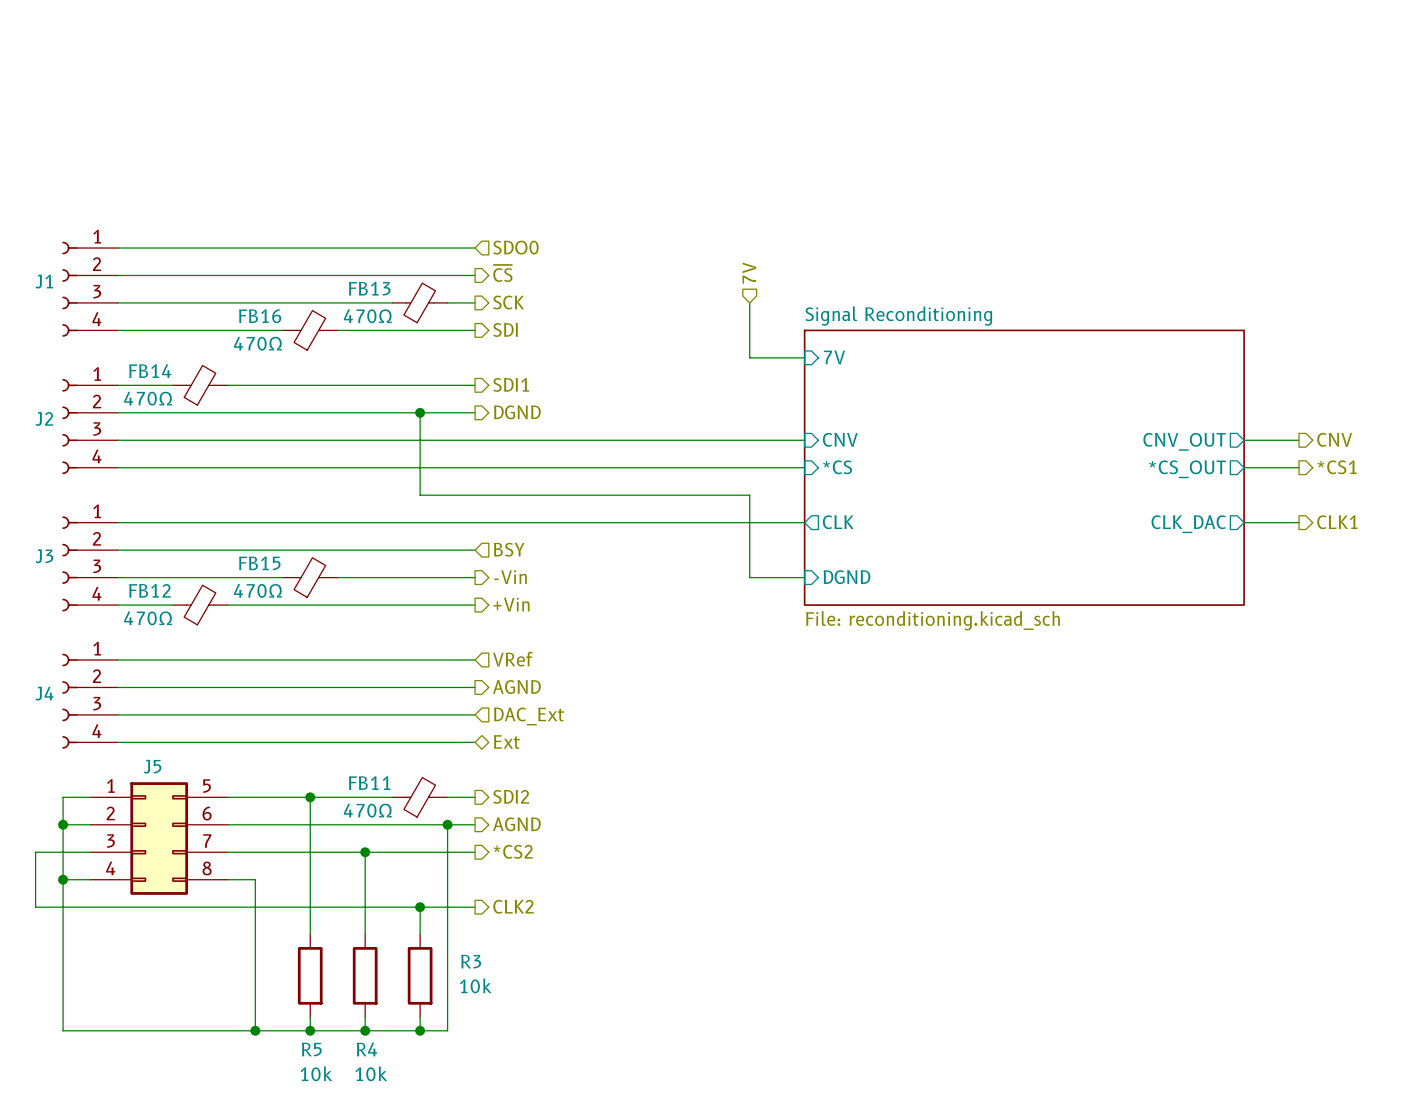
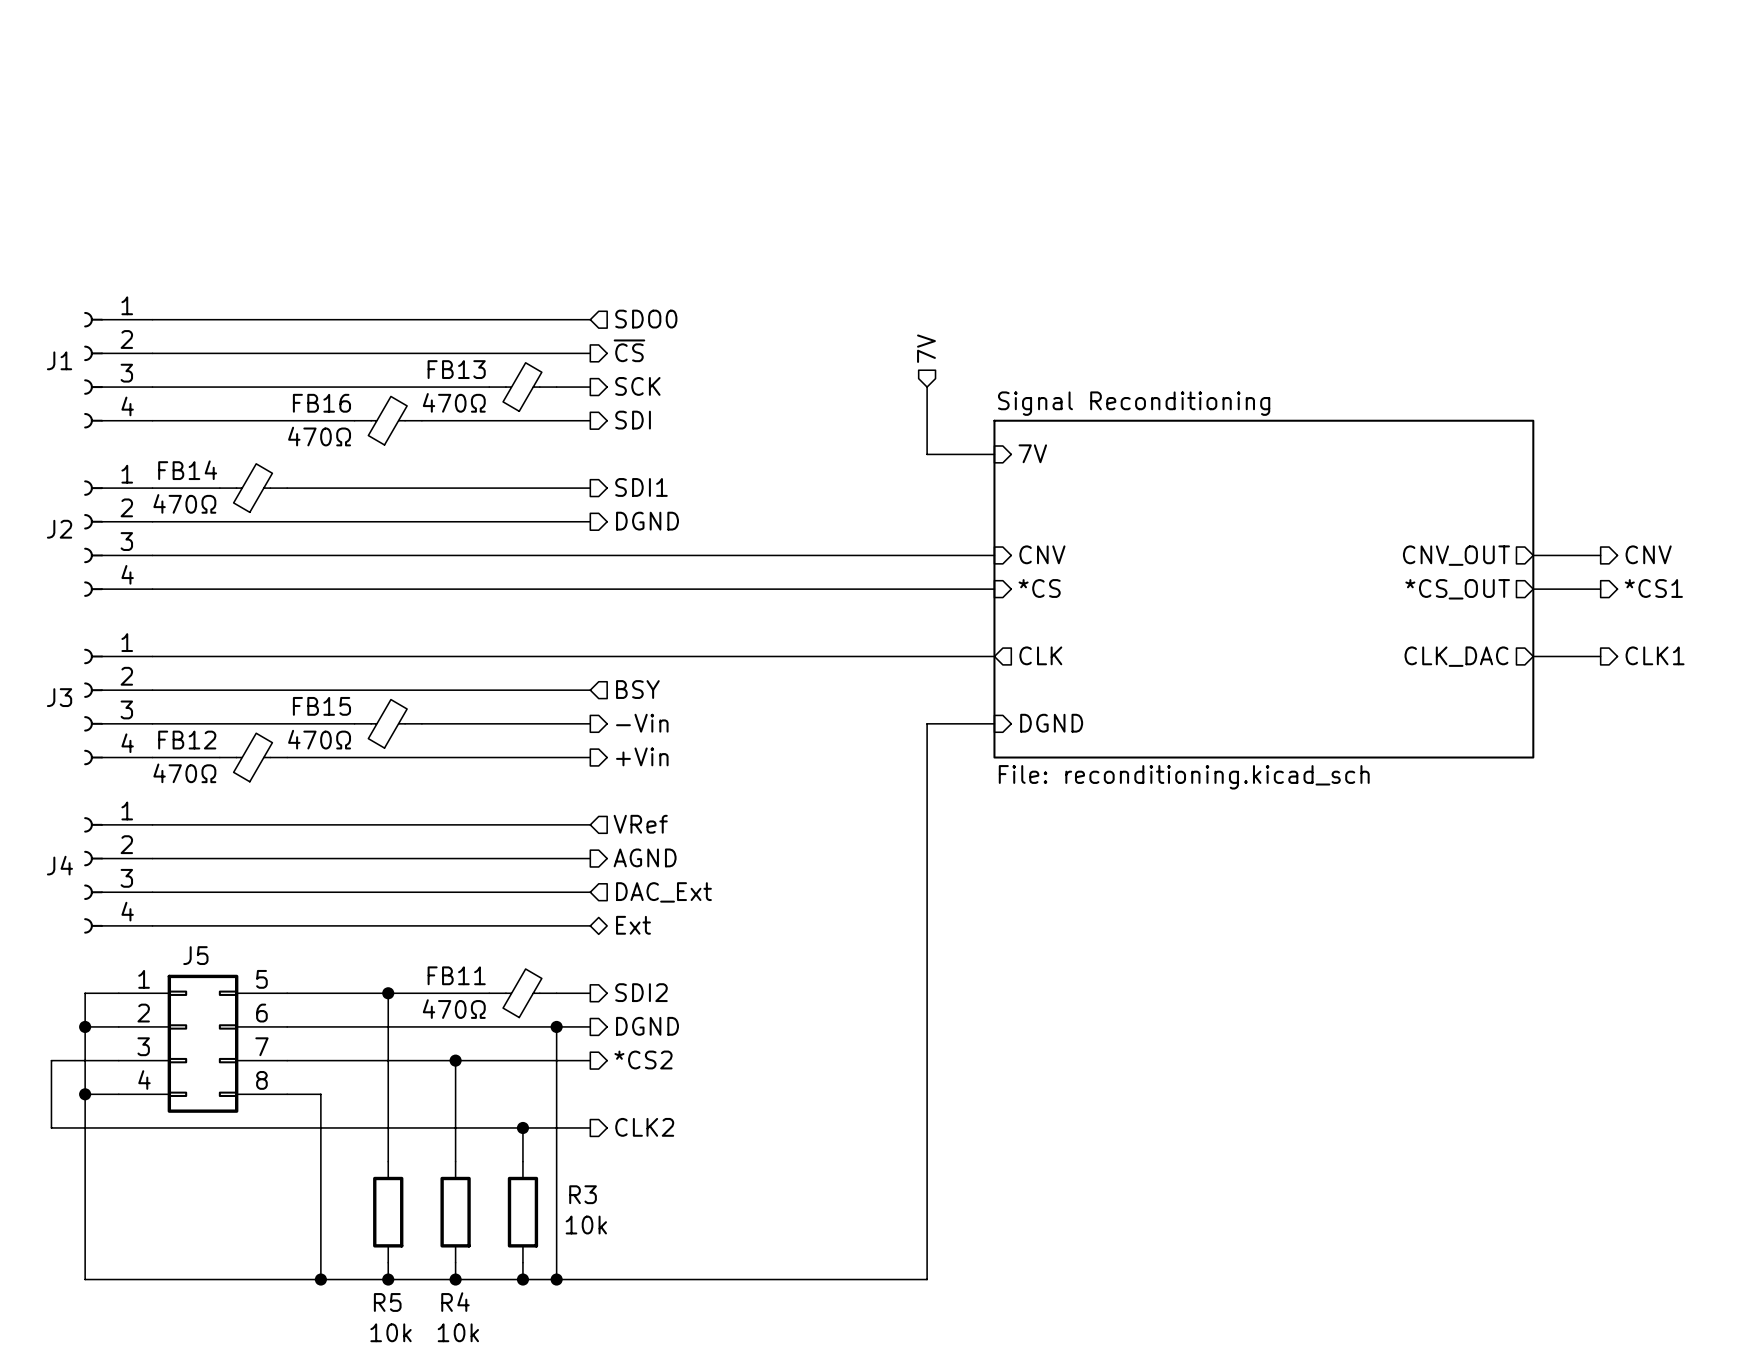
wire: (420, 412) (420, 495) (749, 495) (749, 577) -> (556, 1279) (927, 1279) (927, 723)
junction: (420, 412) -> none
hierarchical label: AGND (516, 824) -> DGND (647, 1026)
junction: none -> (556, 1279)

